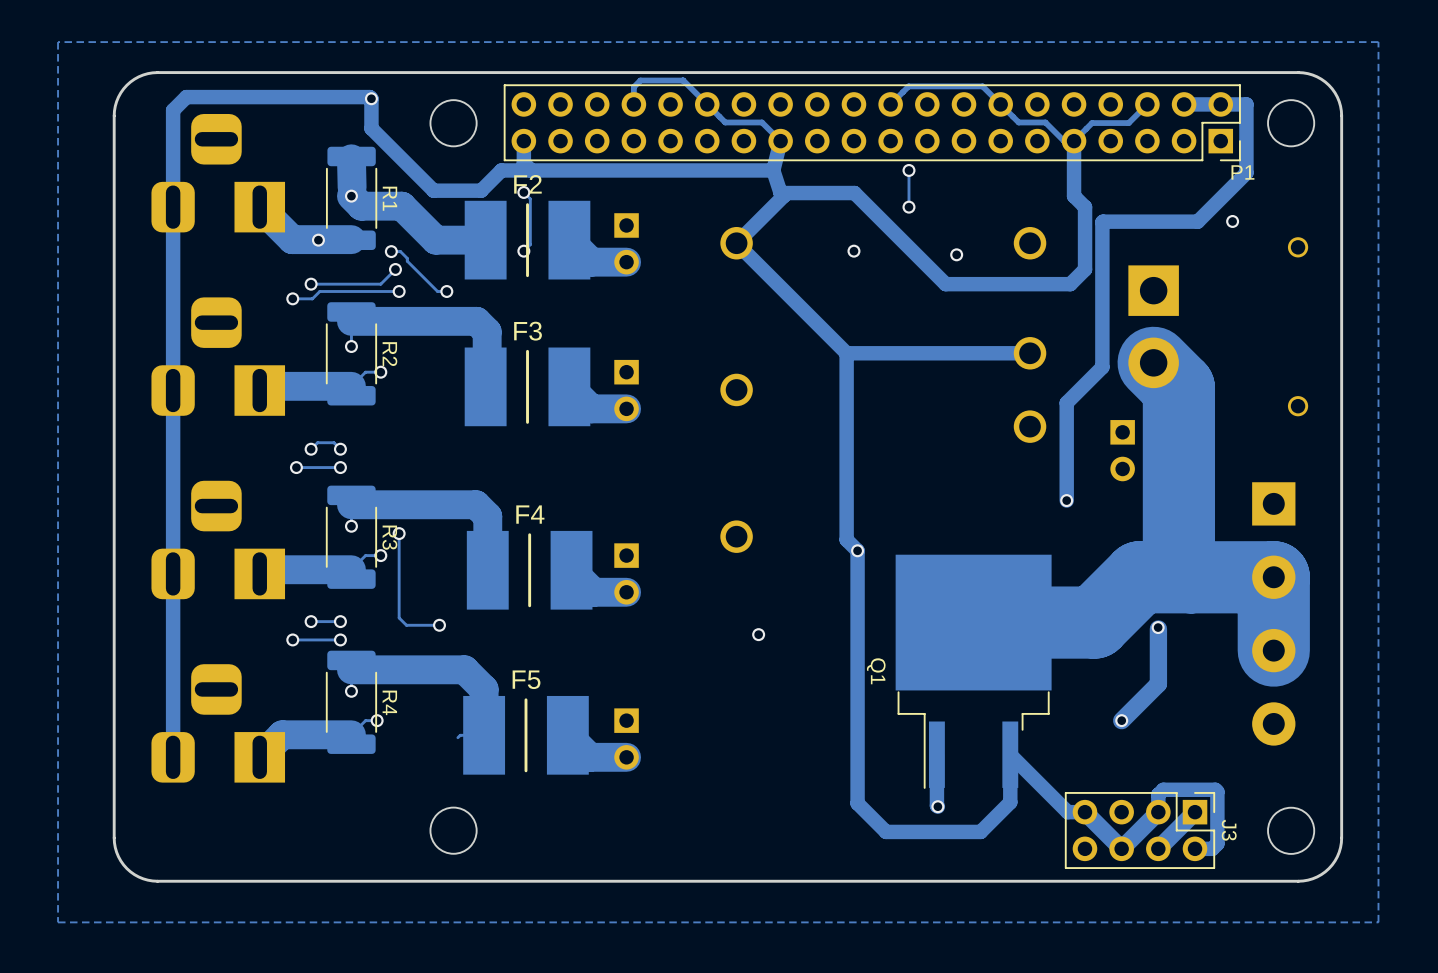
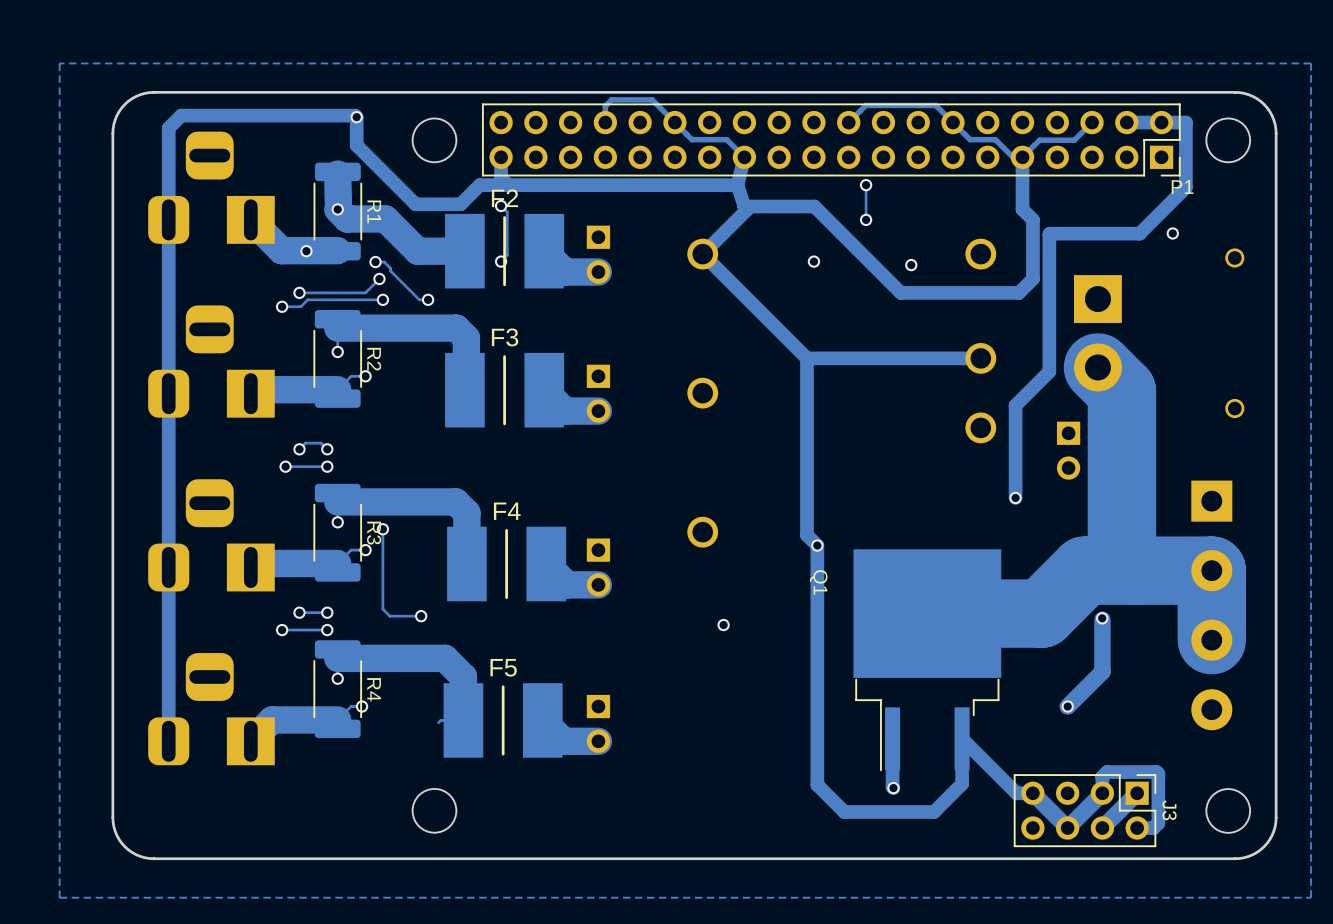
Q1 name position: Q1 (876, 671) -> Q1 (818, 582)

